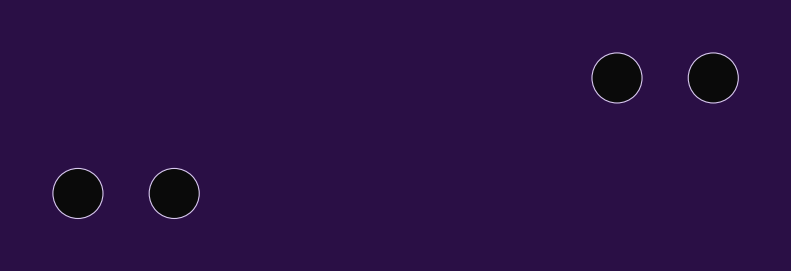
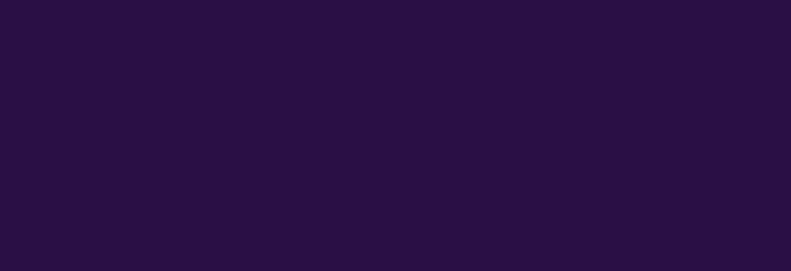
part: (617, 77) -> none
part: (713, 77) -> none
part: (77, 193) -> none
part: (174, 193) -> none

